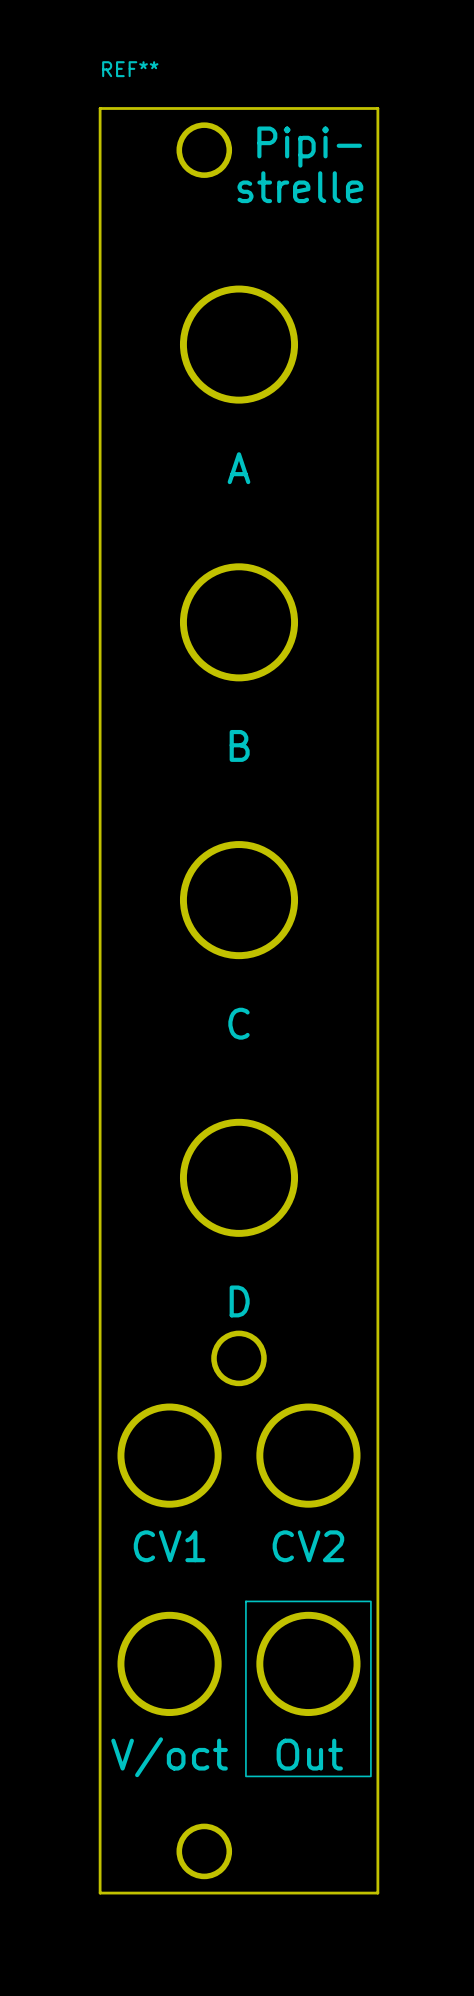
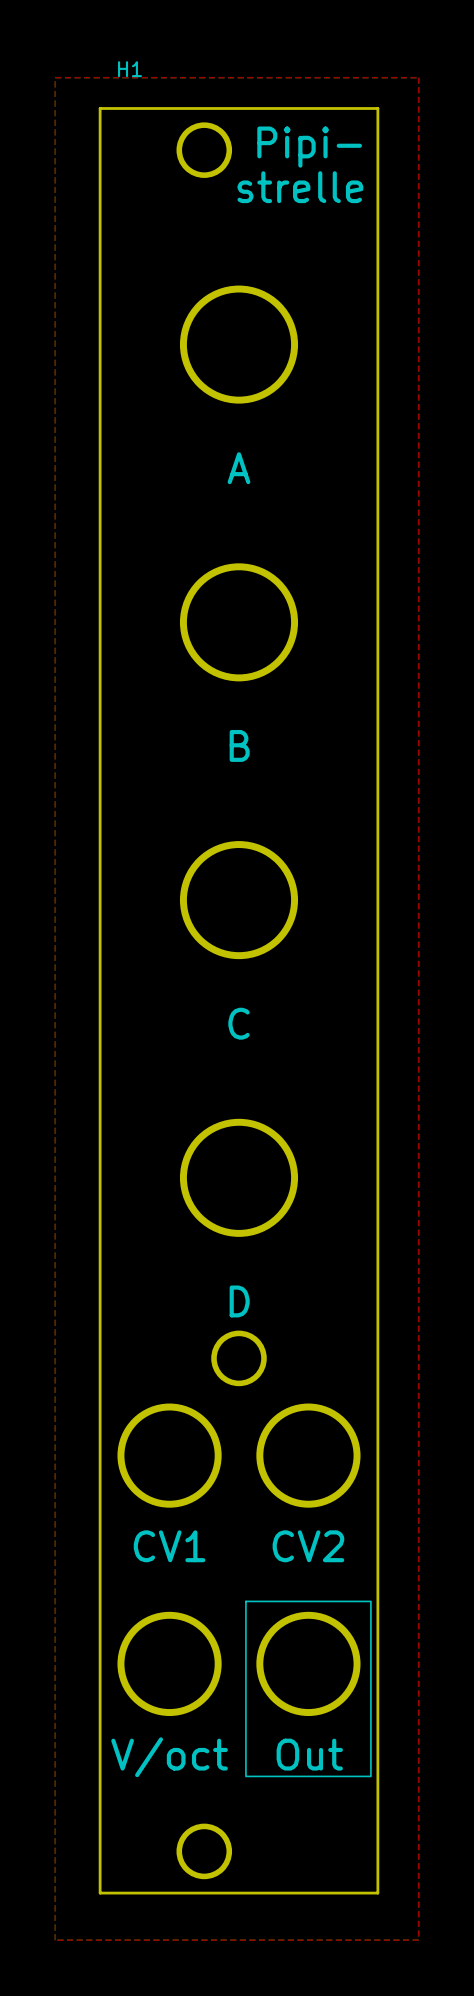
REF** name: REF** (130, 69) -> H1 (129, 69)
top zone outline: none -> (55, 77) (55, 1940) (418, 1940) (418, 77) (55, 77)

